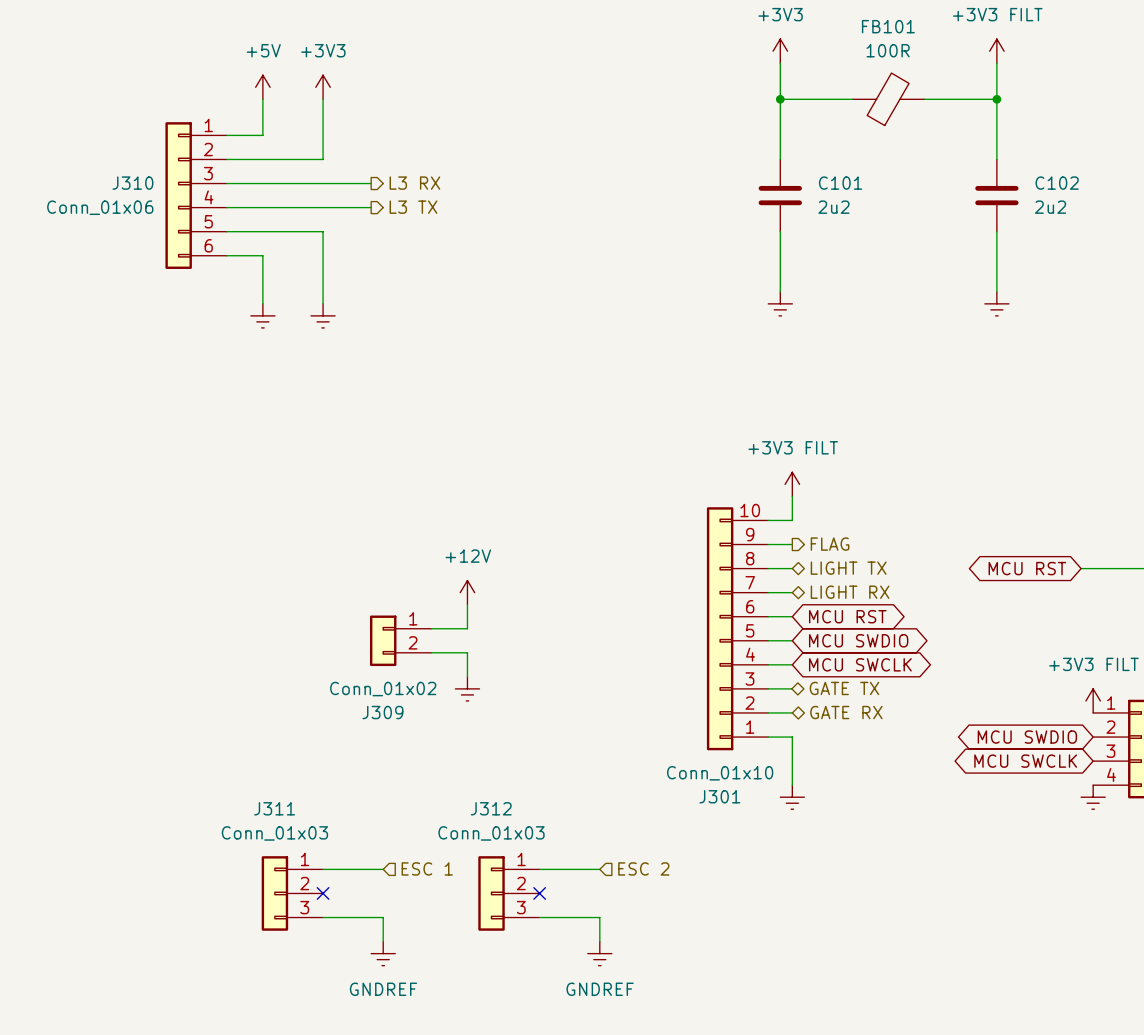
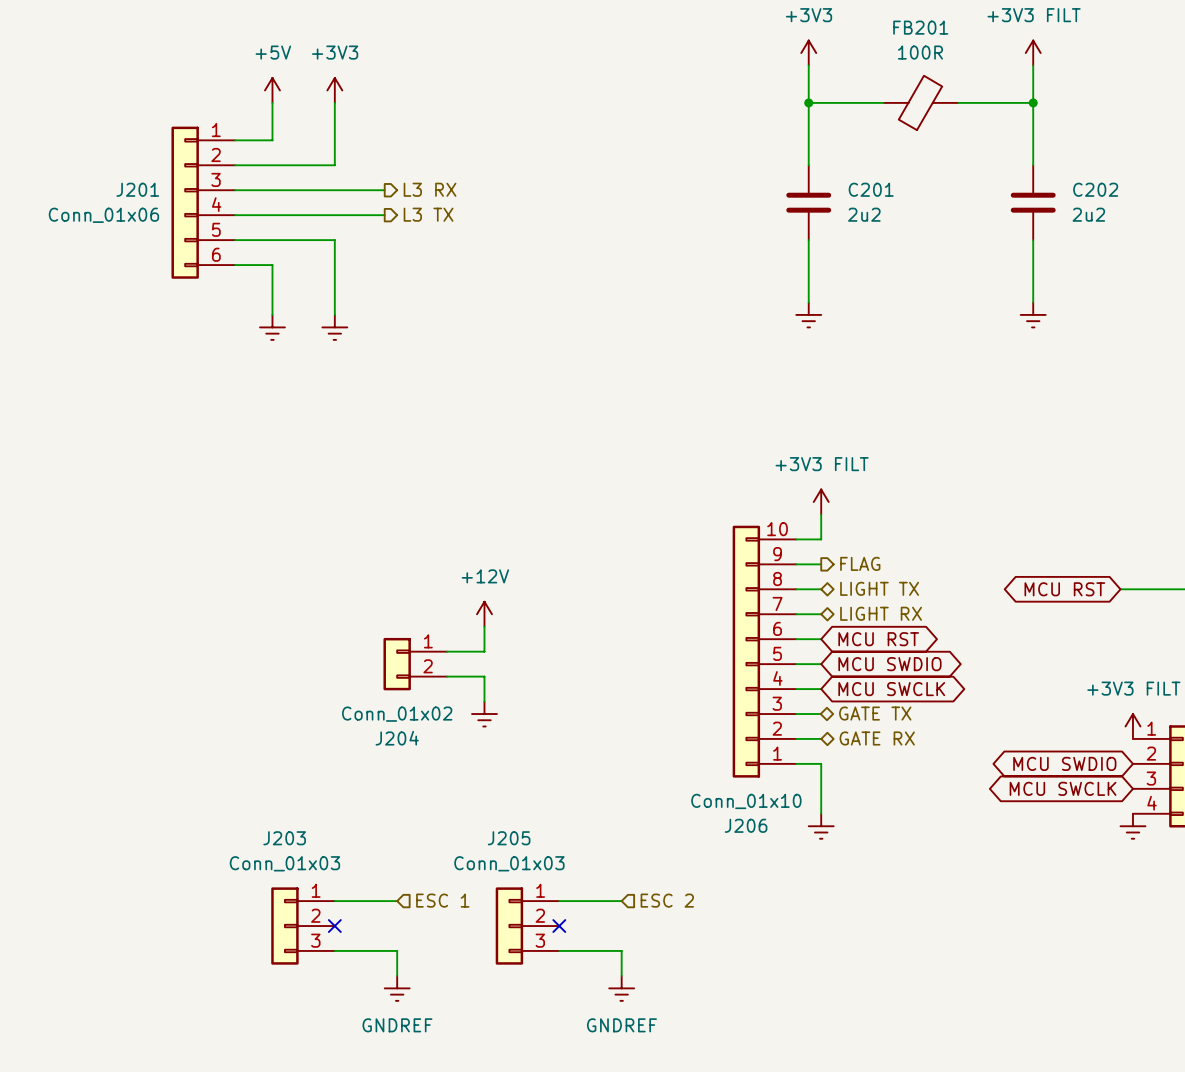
FB101 name: FB101 (888, 26) -> FB201 (920, 27)
J310 name: J310 (132, 183) -> J201 (137, 189)
C101 name: C101 (840, 183) -> C201 (871, 189)
C102 name: C102 (1057, 183) -> C202 (1095, 189)
J309 name: J309 (382, 712) -> J204 (397, 738)
J301 name: J301 (719, 796) -> J206 (746, 825)
J311 name: J311 (274, 808) -> J203 (284, 838)
J312 name: J312 (491, 808) -> J205 (509, 838)

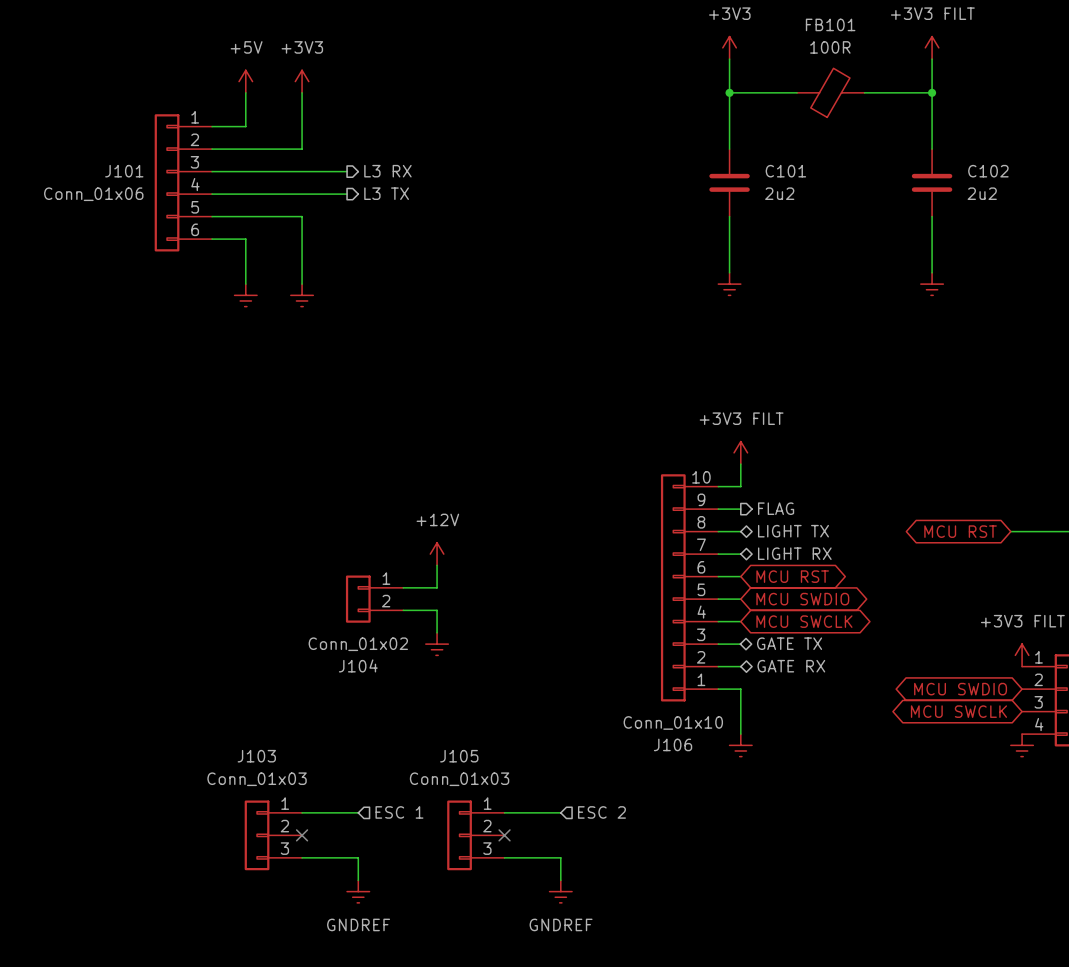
FB201 name: FB201 (920, 27) -> FB101 (830, 24)
J201 name: J201 (137, 189) -> J101 (124, 171)
C201 name: C201 (871, 189) -> C101 (785, 171)
C202 name: C202 (1095, 189) -> C102 (988, 171)
J204 name: J204 (397, 738) -> J104 (358, 665)
J206 name: J206 (746, 825) -> J106 (673, 744)
J203 name: J203 (284, 838) -> J103 (256, 756)
J205 name: J205 (509, 838) -> J105 (459, 756)

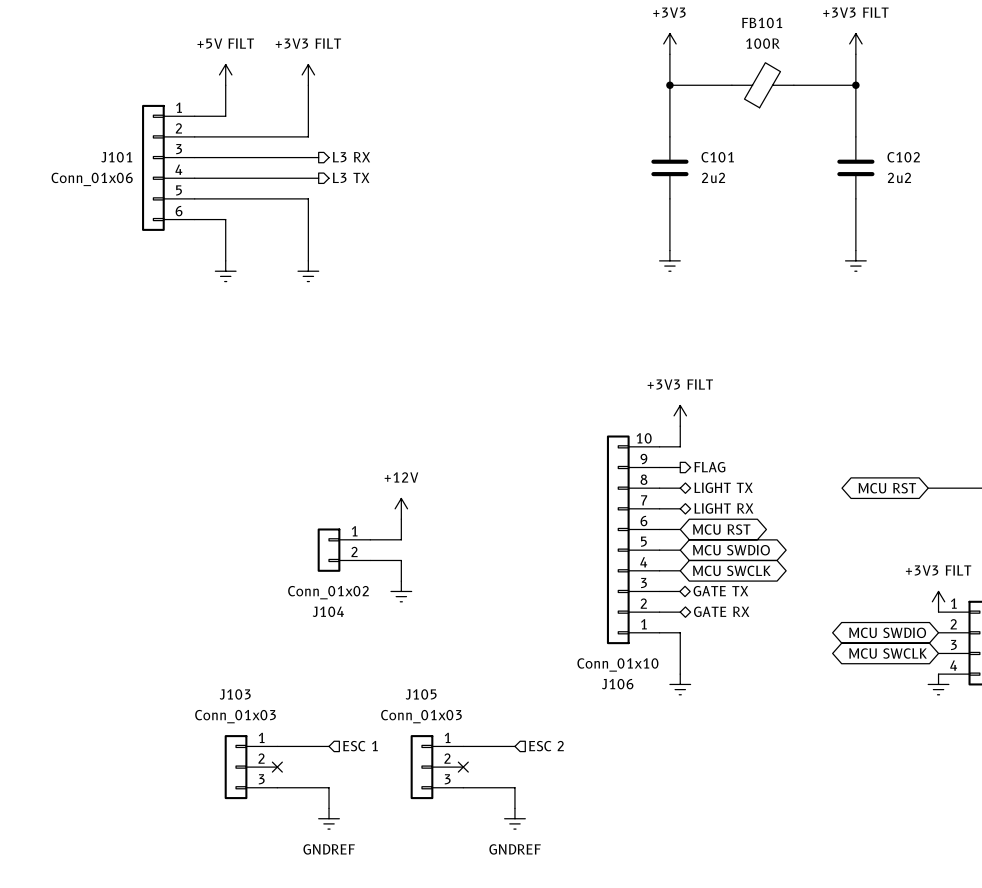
power symbol: +5V (245, 81) -> +5V FILT (225, 74)
power symbol: +3V3 (302, 81) -> none
power symbol: none -> +3V3 FILT (308, 74)
wire: (302, 92) (302, 149) -> (308, 85) (308, 136) (277, 136)
wire: (302, 216) (302, 284) -> (277, 198) (308, 198) (308, 260)
power symbol position: (302, 295) -> (308, 271)

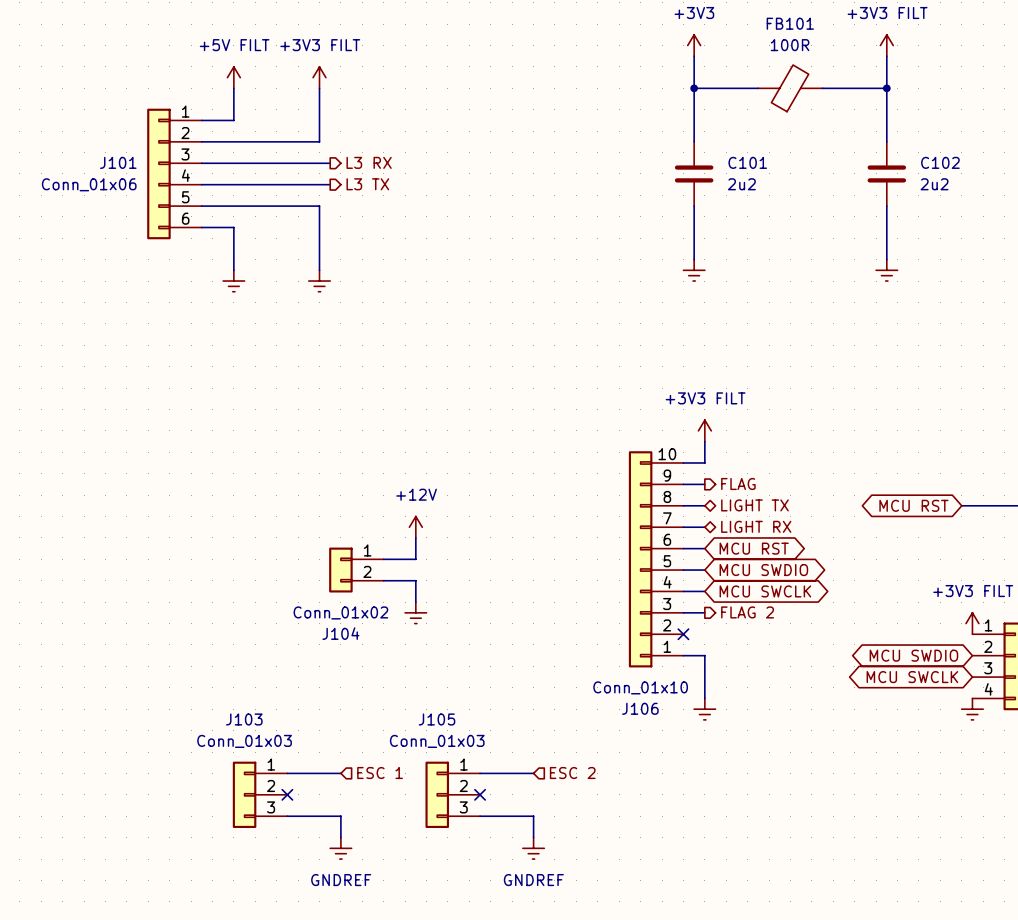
hierarchical label shape: bidirectional (720, 591) -> output (747, 612)
hierarchical label: GATE TX (720, 591) -> FLAG 2 (747, 612)
hierarchical label: GATE RX (721, 611) -> none
wire: (659, 612) (680, 612) -> none
no-connect mark: none -> (683, 634)

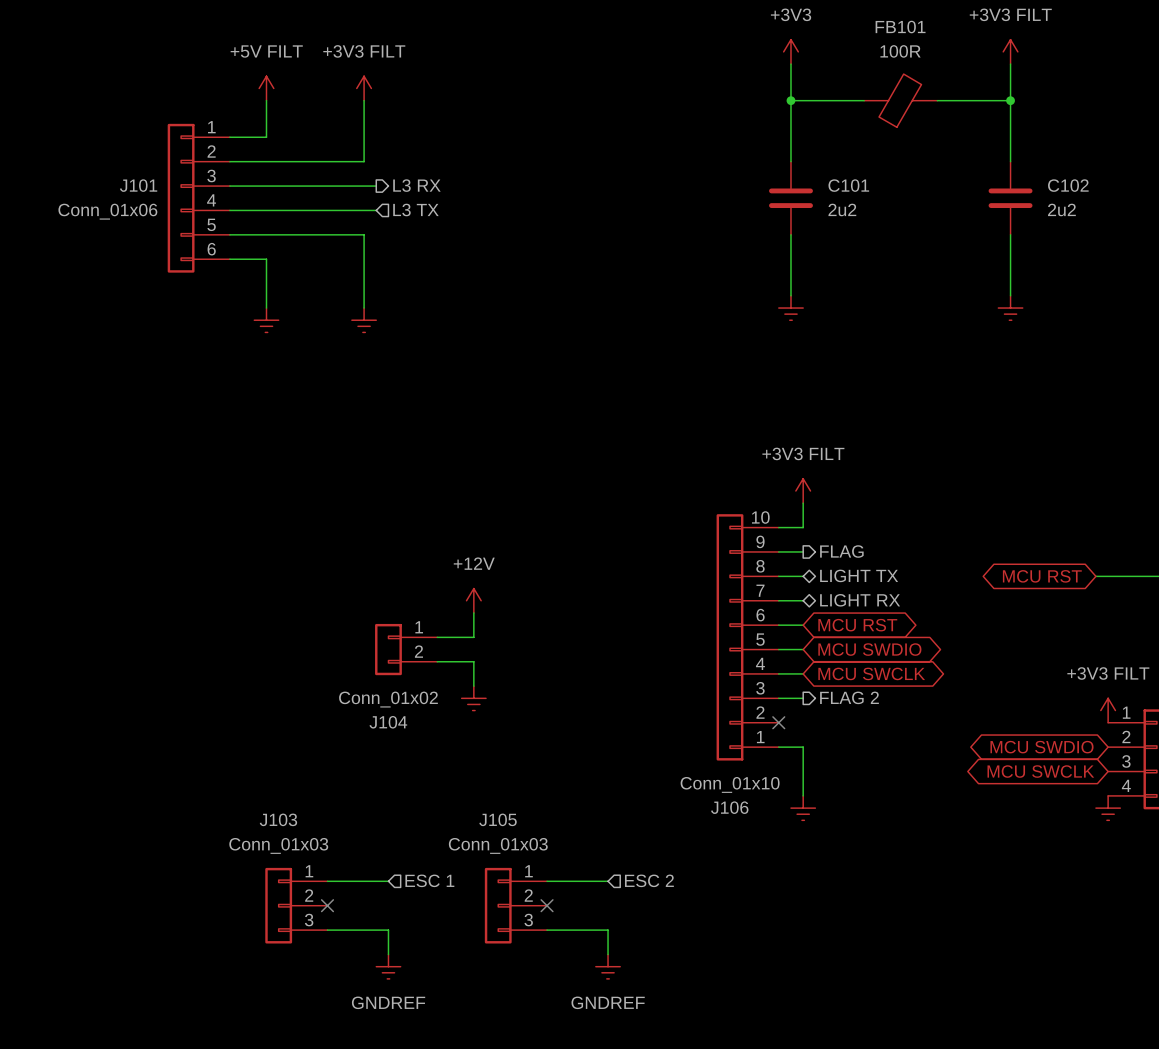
hierarchical label shape: output (367, 184) -> input (415, 209)

